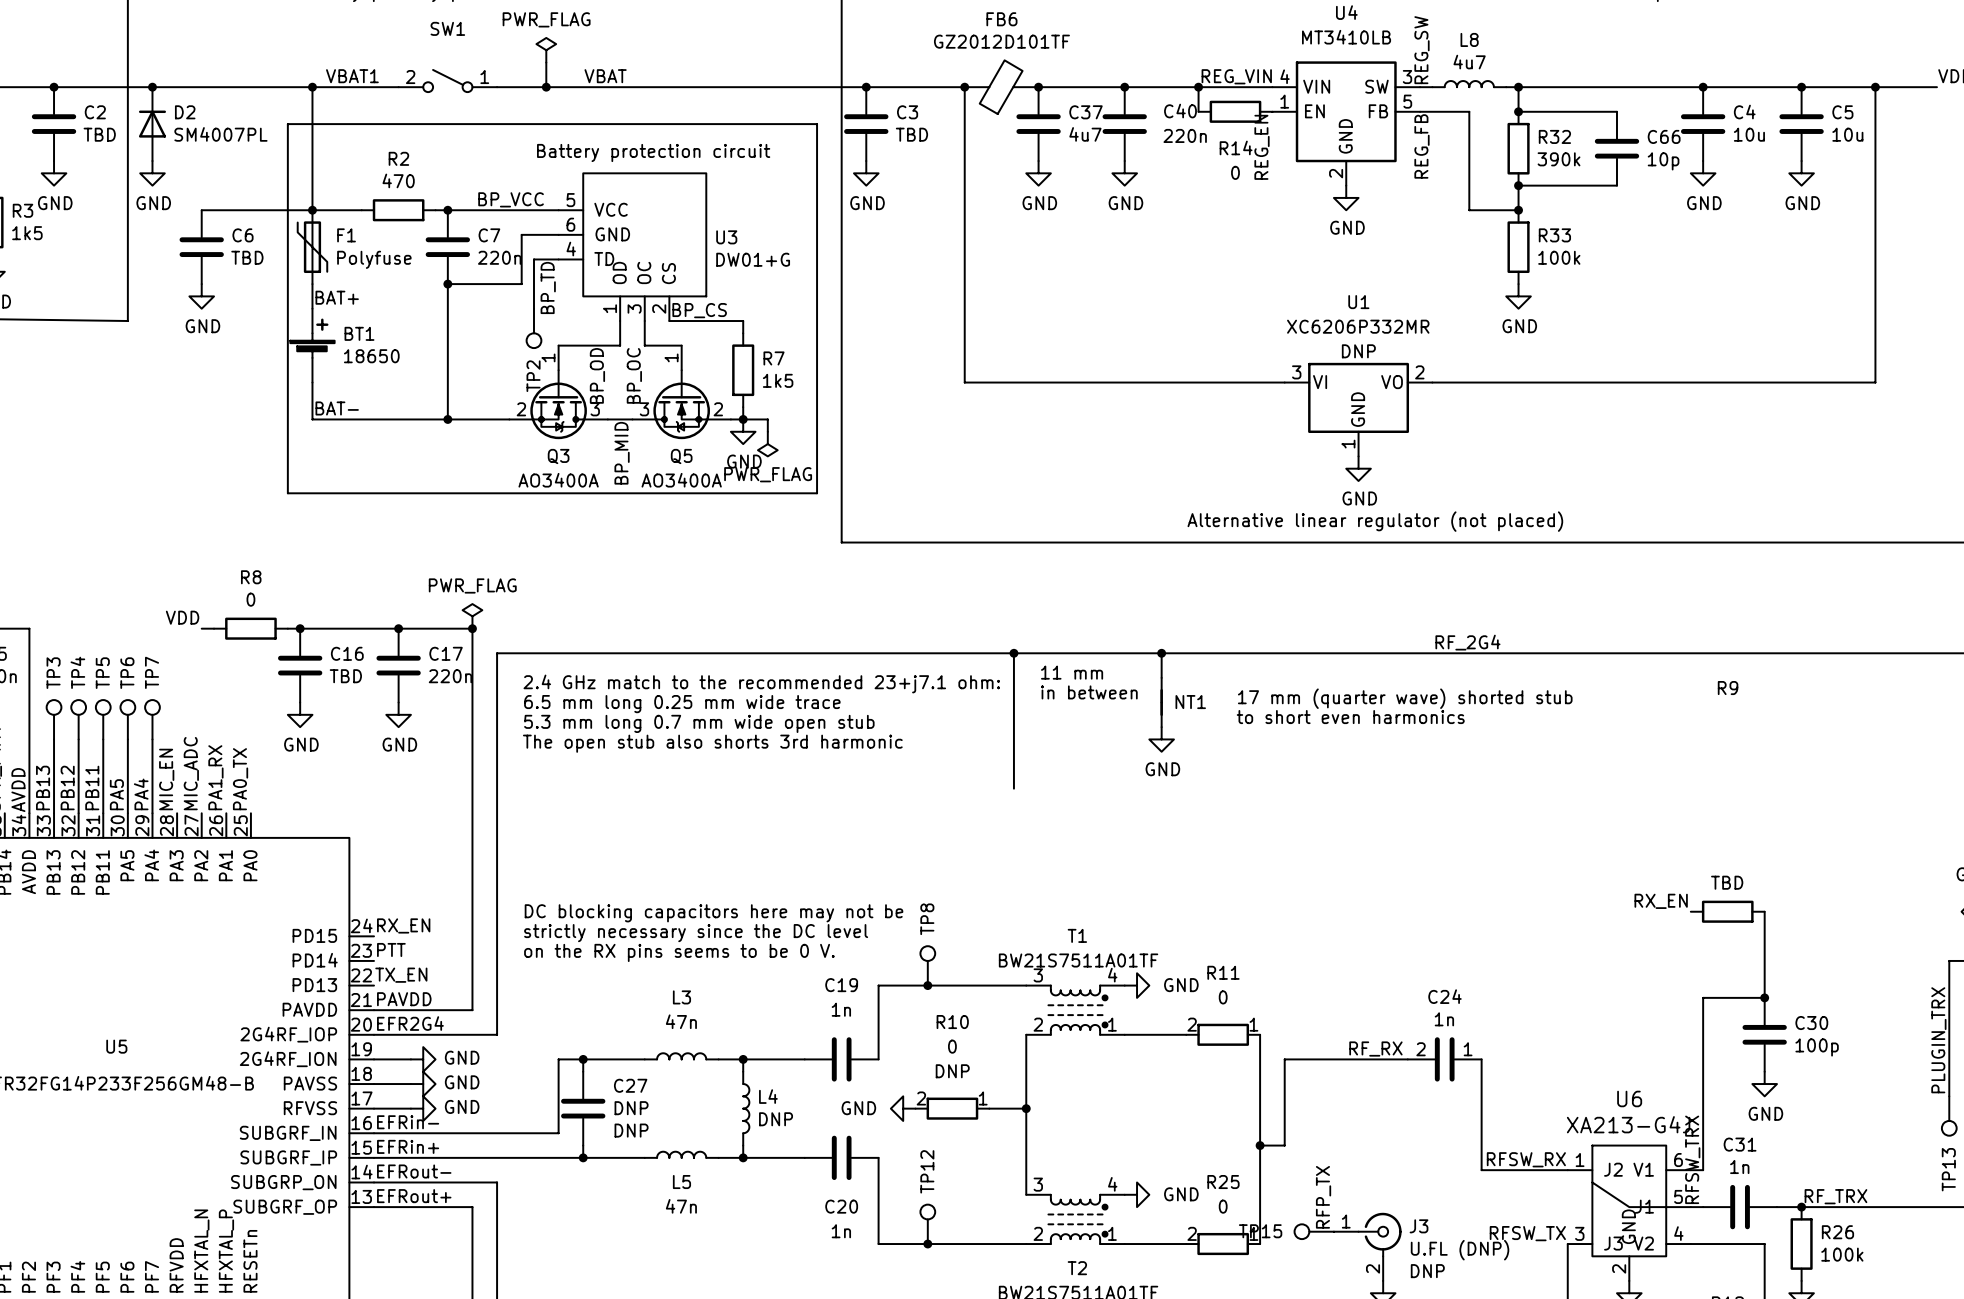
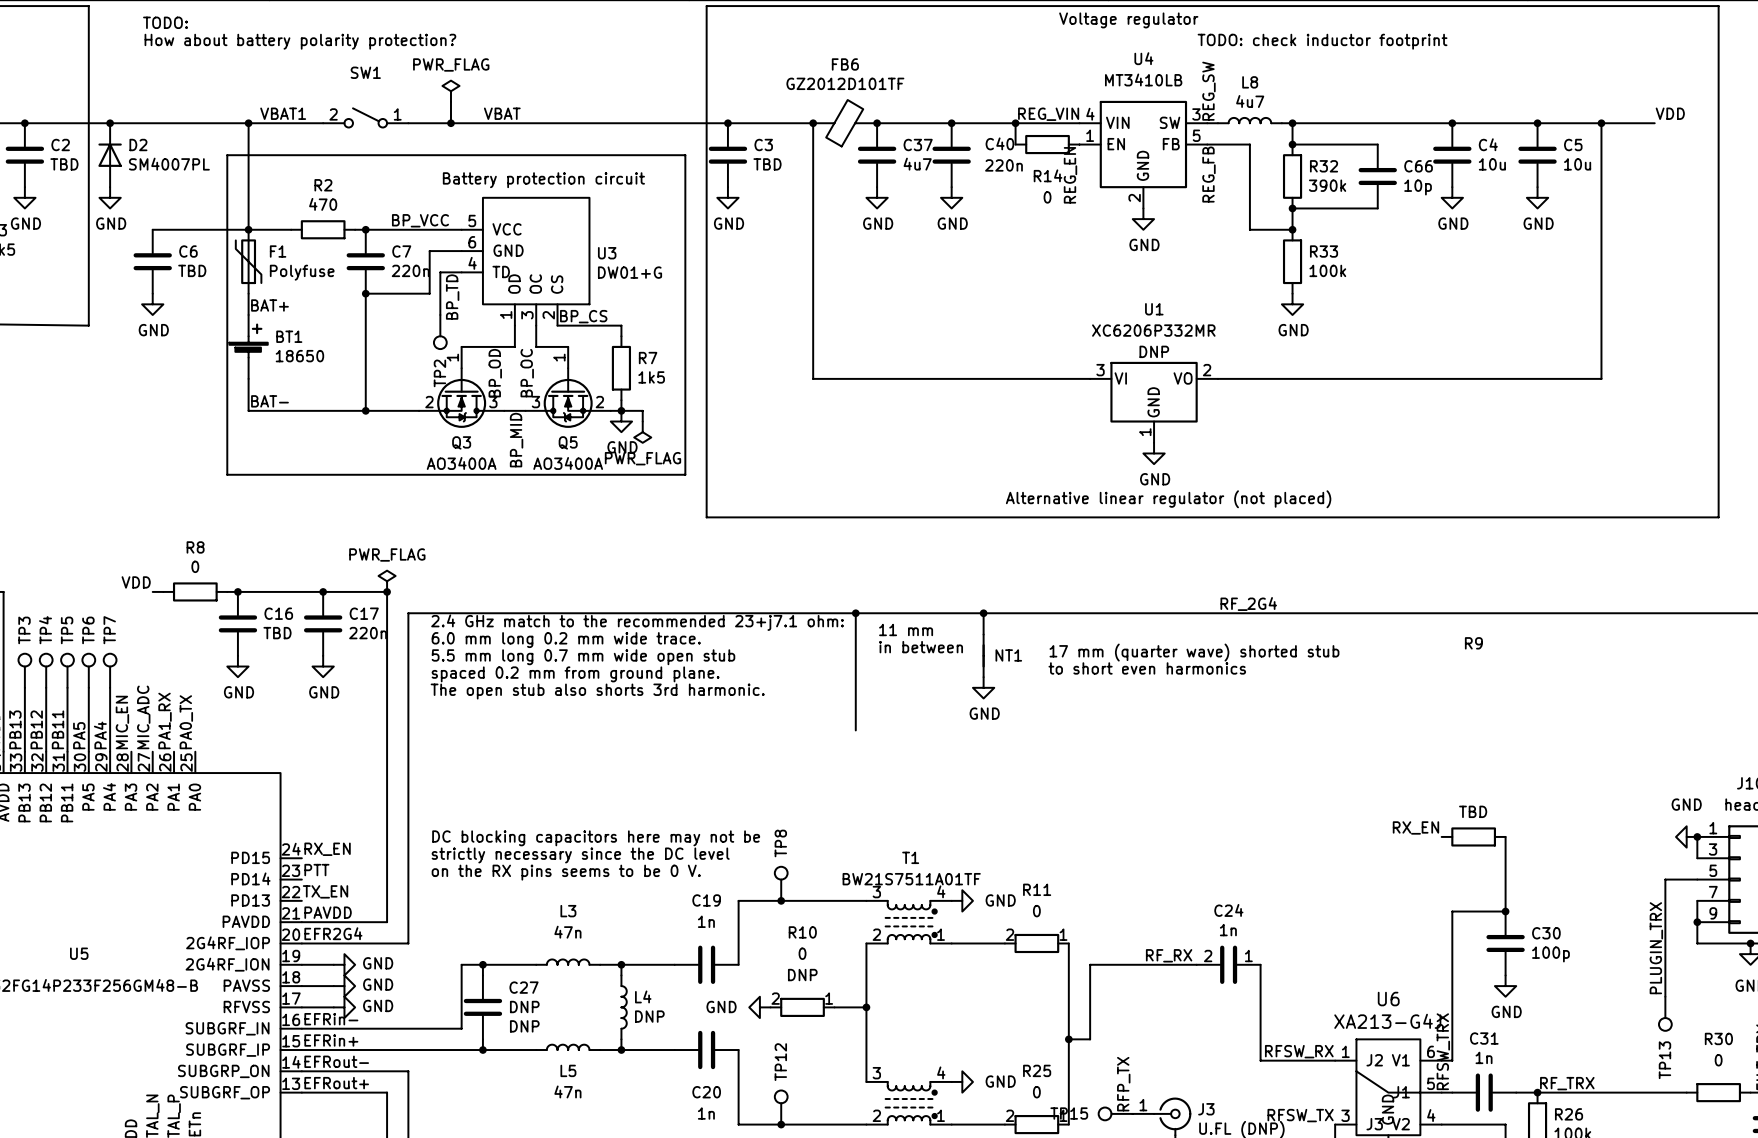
text: none -> 2.4 GHz match to the recommended 23+j7.1 ohm: (637, 622)
text: 2.4 GHz match to the recommended 23+j7.1 ohm: (761, 683) -> 6.0 mm long 0.2 mm wide trace. (566, 640)
text: 6.5 mm long 0.25 mm wide trace (682, 704) -> 5.5 mm long 0.7 mm wide open stub (583, 657)
text: 5.3 mm long 0.7 mm wide open stub (699, 723) -> spaced 0.2 mm from ground plane. (575, 674)
text: The open stub also shorts 3rd harmonic (712, 743) -> The open stub also shorts 3rd harmonic. (597, 691)

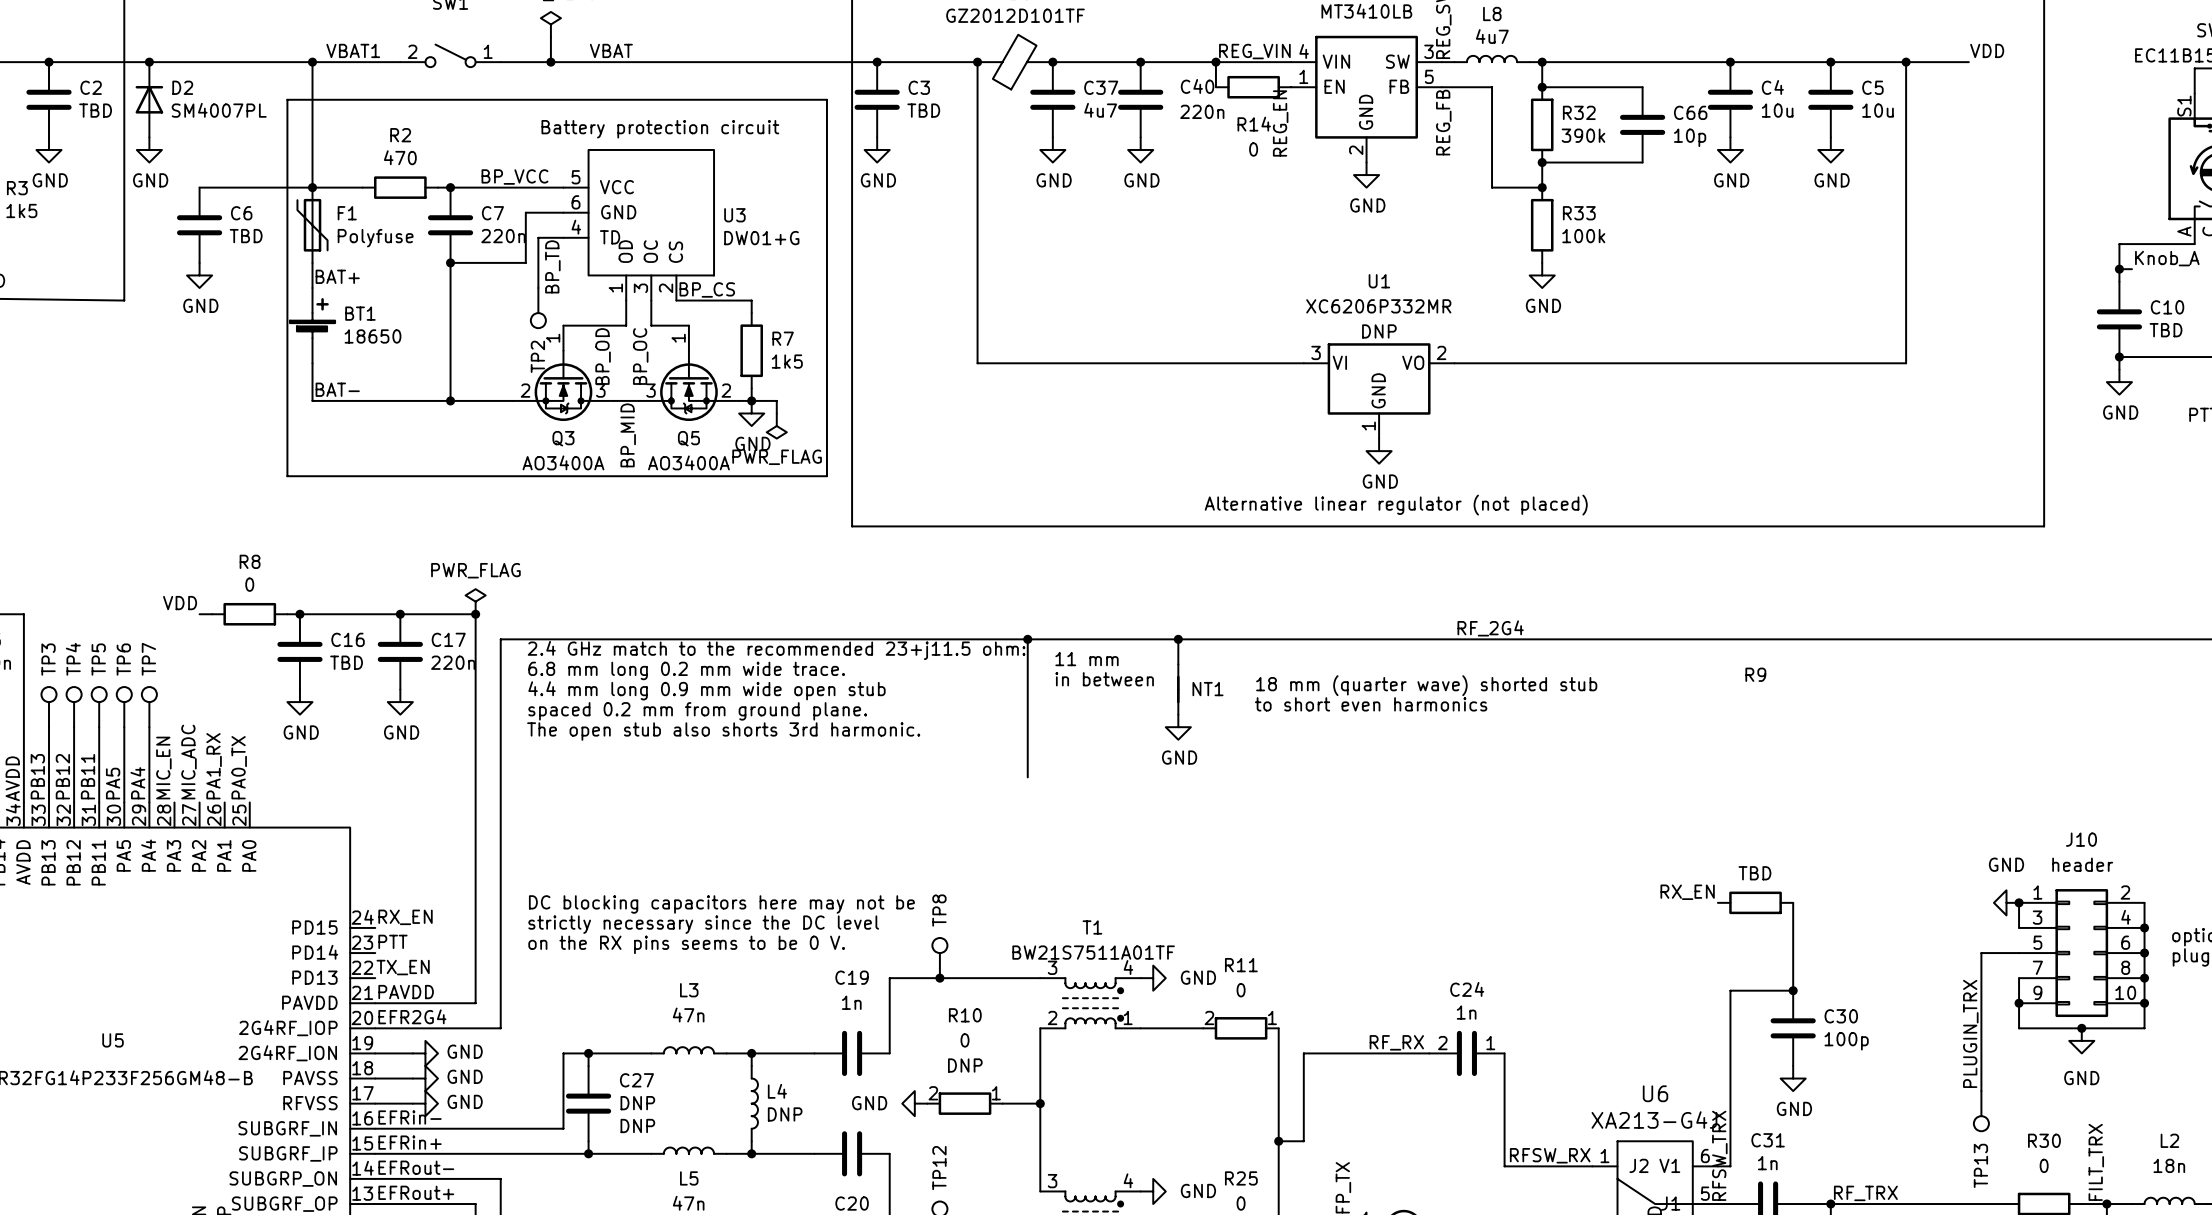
text: 2.4 GHz match to the recommended 23+j7.1 ohm: (637, 622) -> 2.4 GHz match to the recommended 23+j11.5 ohm: (776, 650)
text: 6.0 mm long 0.2 mm wide trace. (566, 640) -> 6.8 mm long 0.2 mm wide trace. (686, 670)
text: 17 mm (quarter wave) shorted stub (1194, 652) -> 18 mm (quarter wave) shorted stub (1426, 685)
text: 5.5 mm long 0.7 mm wide open stub (583, 657) -> 4.4 mm long 0.9 mm wide open stub (706, 690)

